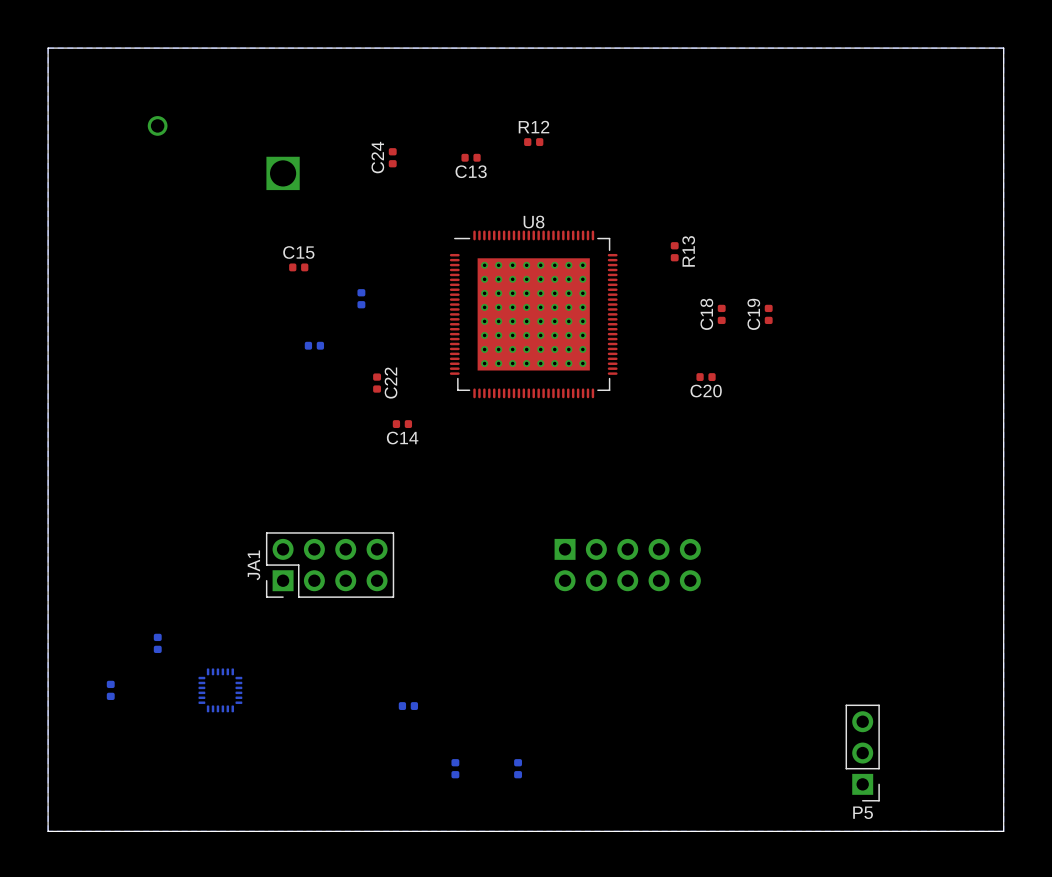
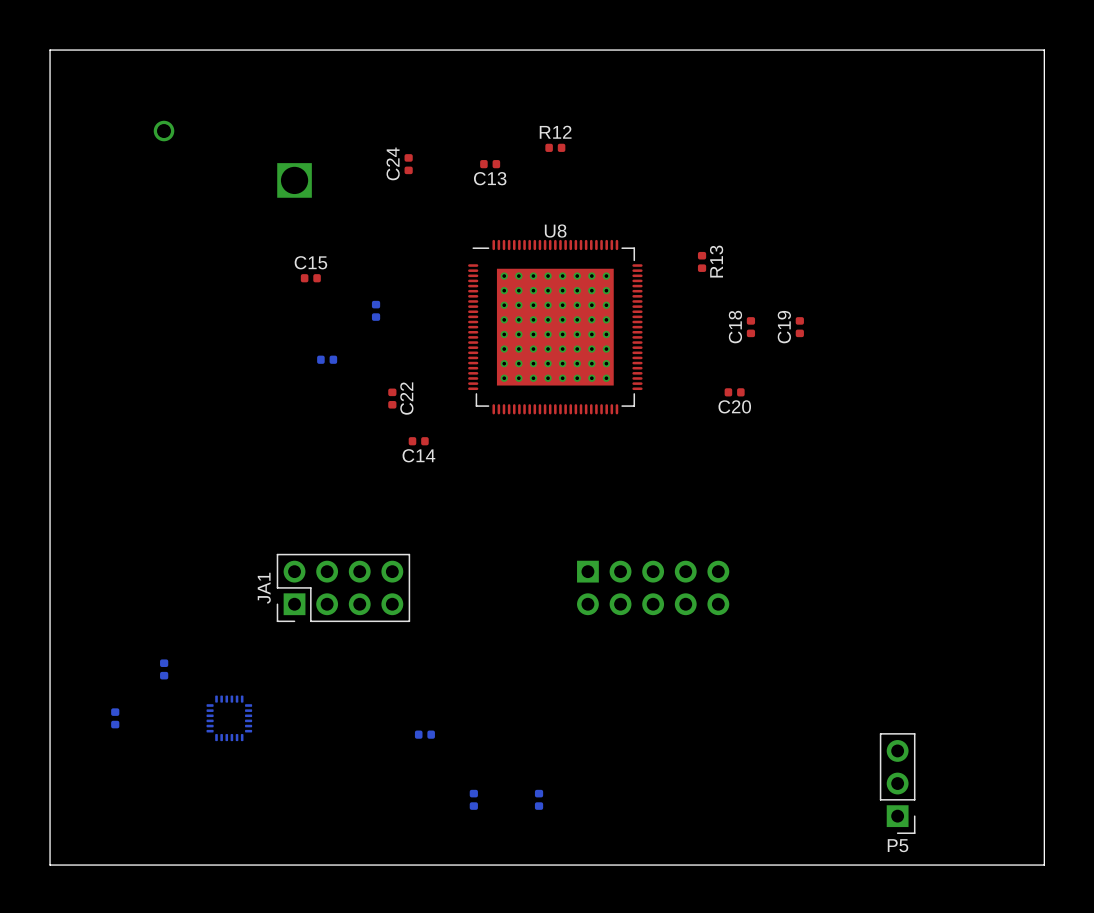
bottom zone outline: (48, 48) (48, 831) (1003, 831) (1003, 48) (48, 48) -> none

